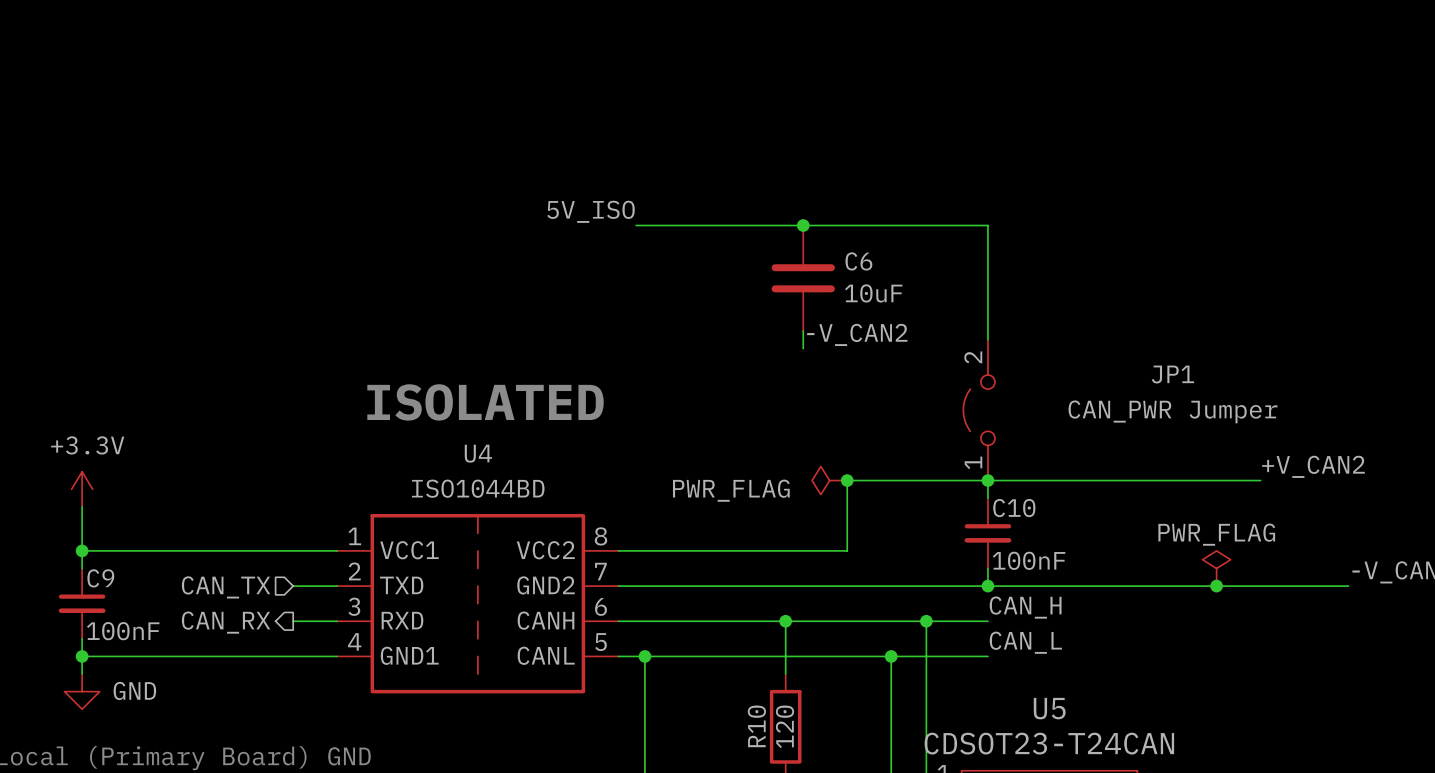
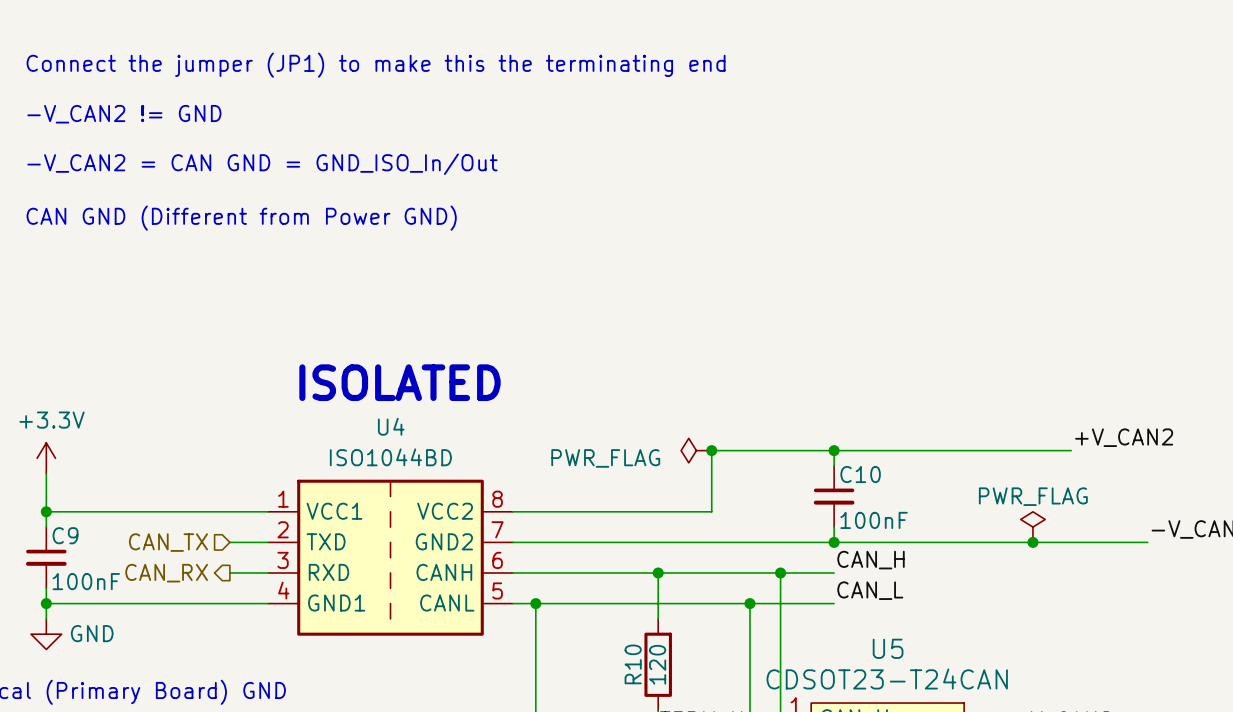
text: none -> Connect the jumper (JP1) to make this the terminating end (376, 65)
text: none -> -V_CAN2 != GND (124, 114)
text: none -> -V_CAN2 = CAN GND = GND_ISO_In/Out (262, 164)
label: 5V_ISO (591, 211) -> none
text: none -> CAN GND (Different from Power GND) (241, 218)
wire: (636, 225) (987, 225) (987, 339) -> none
junction: (803, 225) -> none
C6: 10uF (803, 278) -> none
wire: (803, 331) (803, 348) -> none
label: -V_CAN2 (857, 334) -> none
JP1: CAN_PWR Jumper (979, 410) -> none

